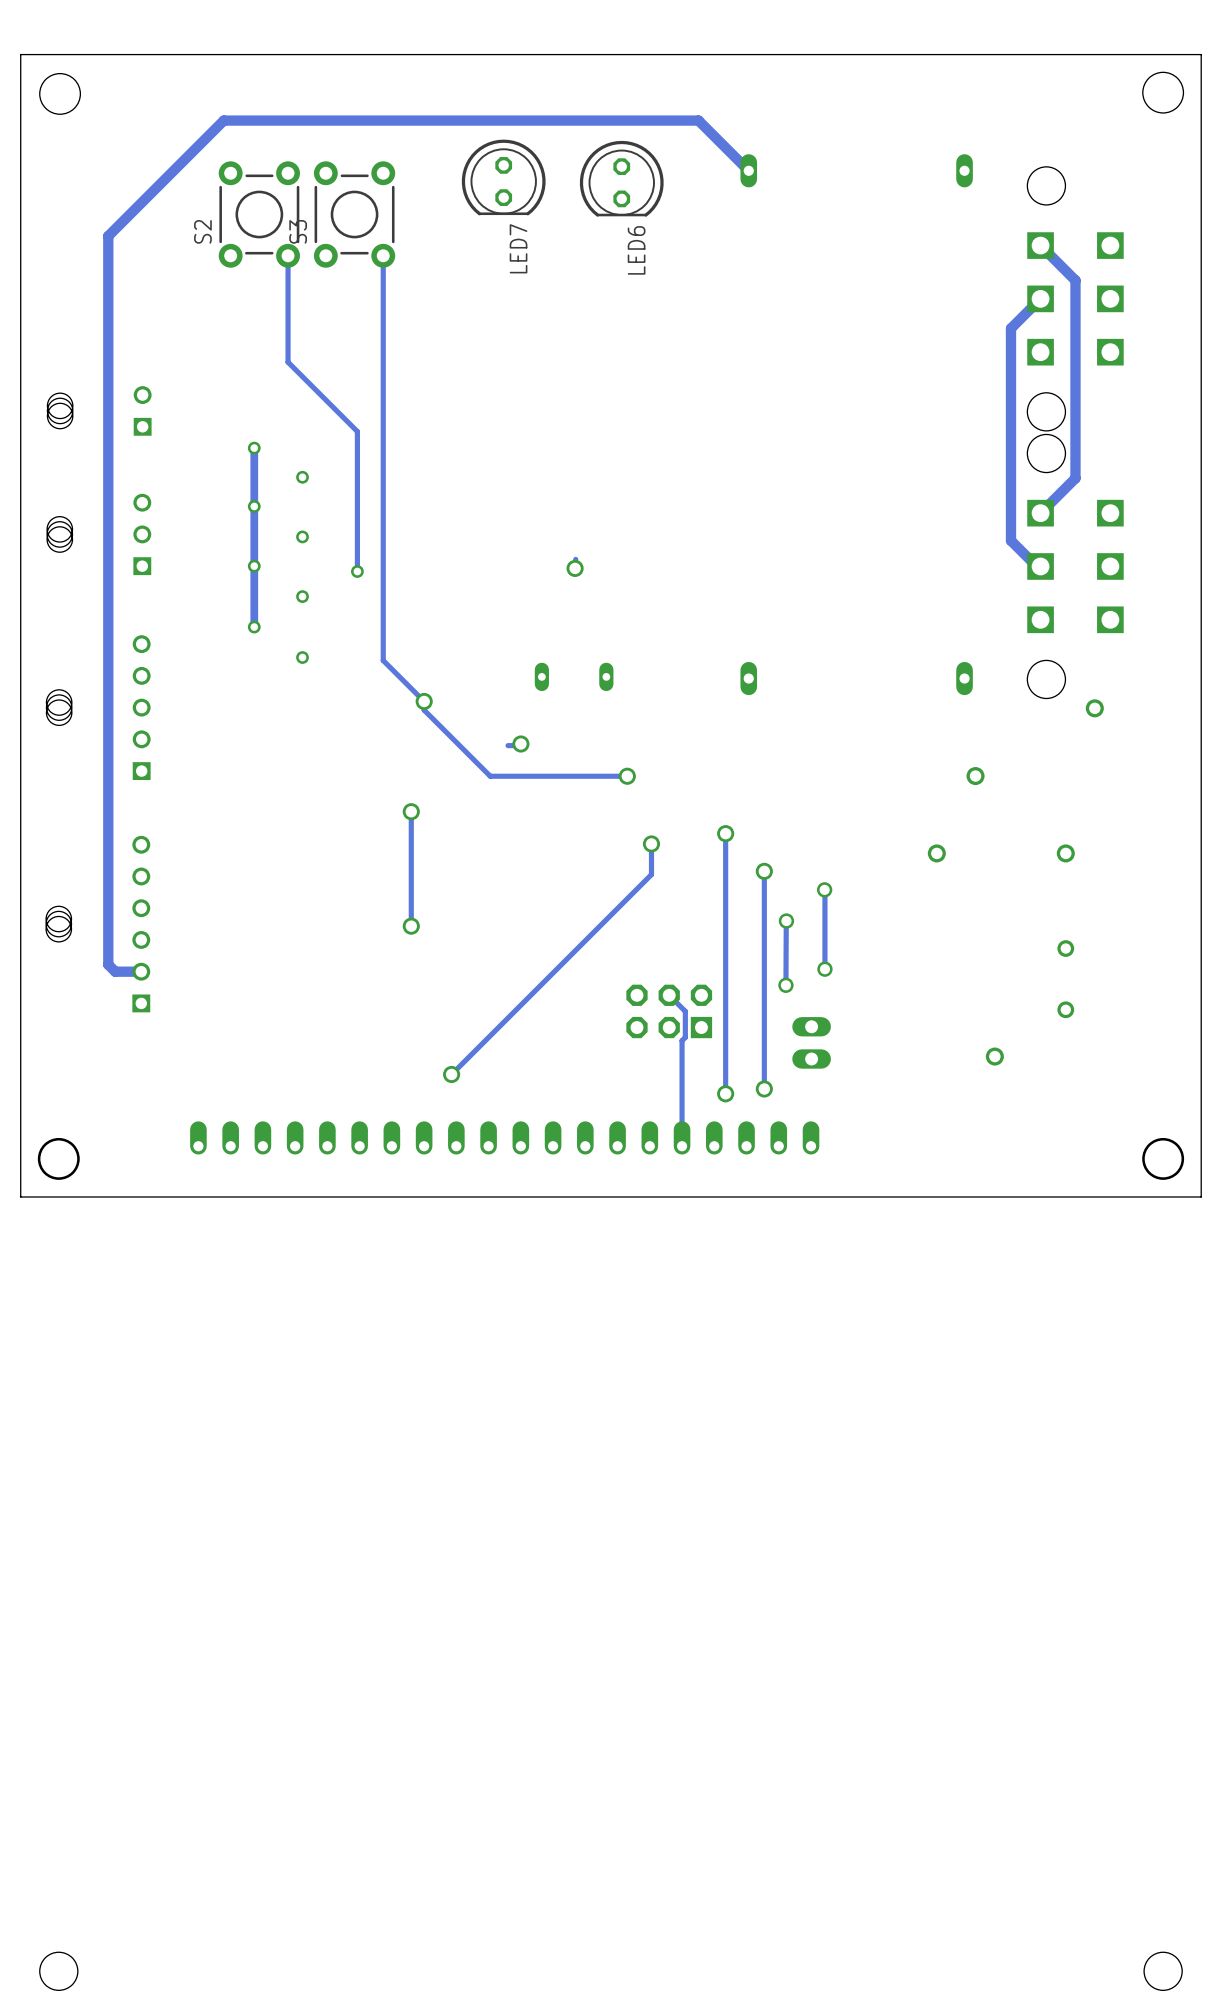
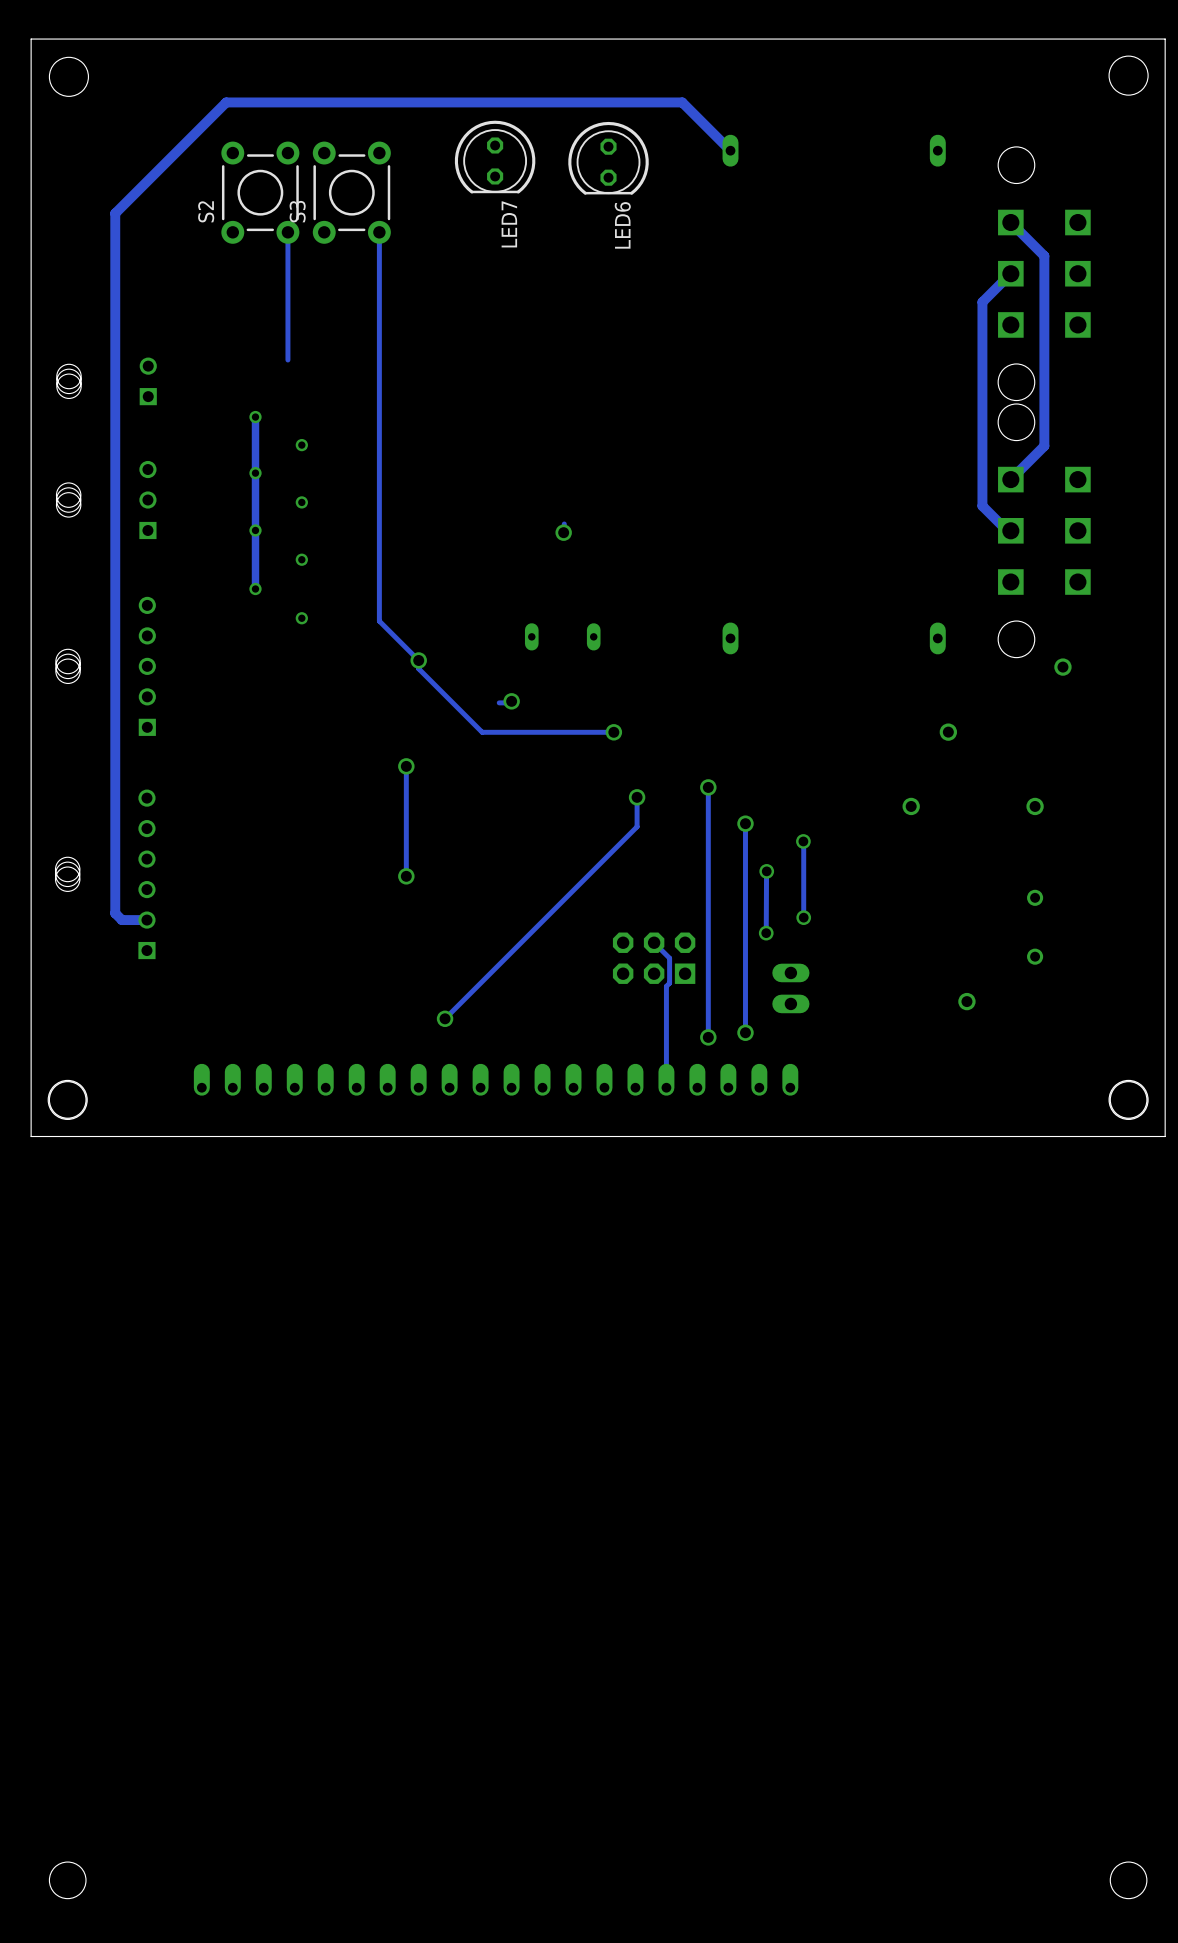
track: (288, 362) (357, 431) (356, 572) -> (287, 334) (287, 360)
via: (357, 571) -> none

